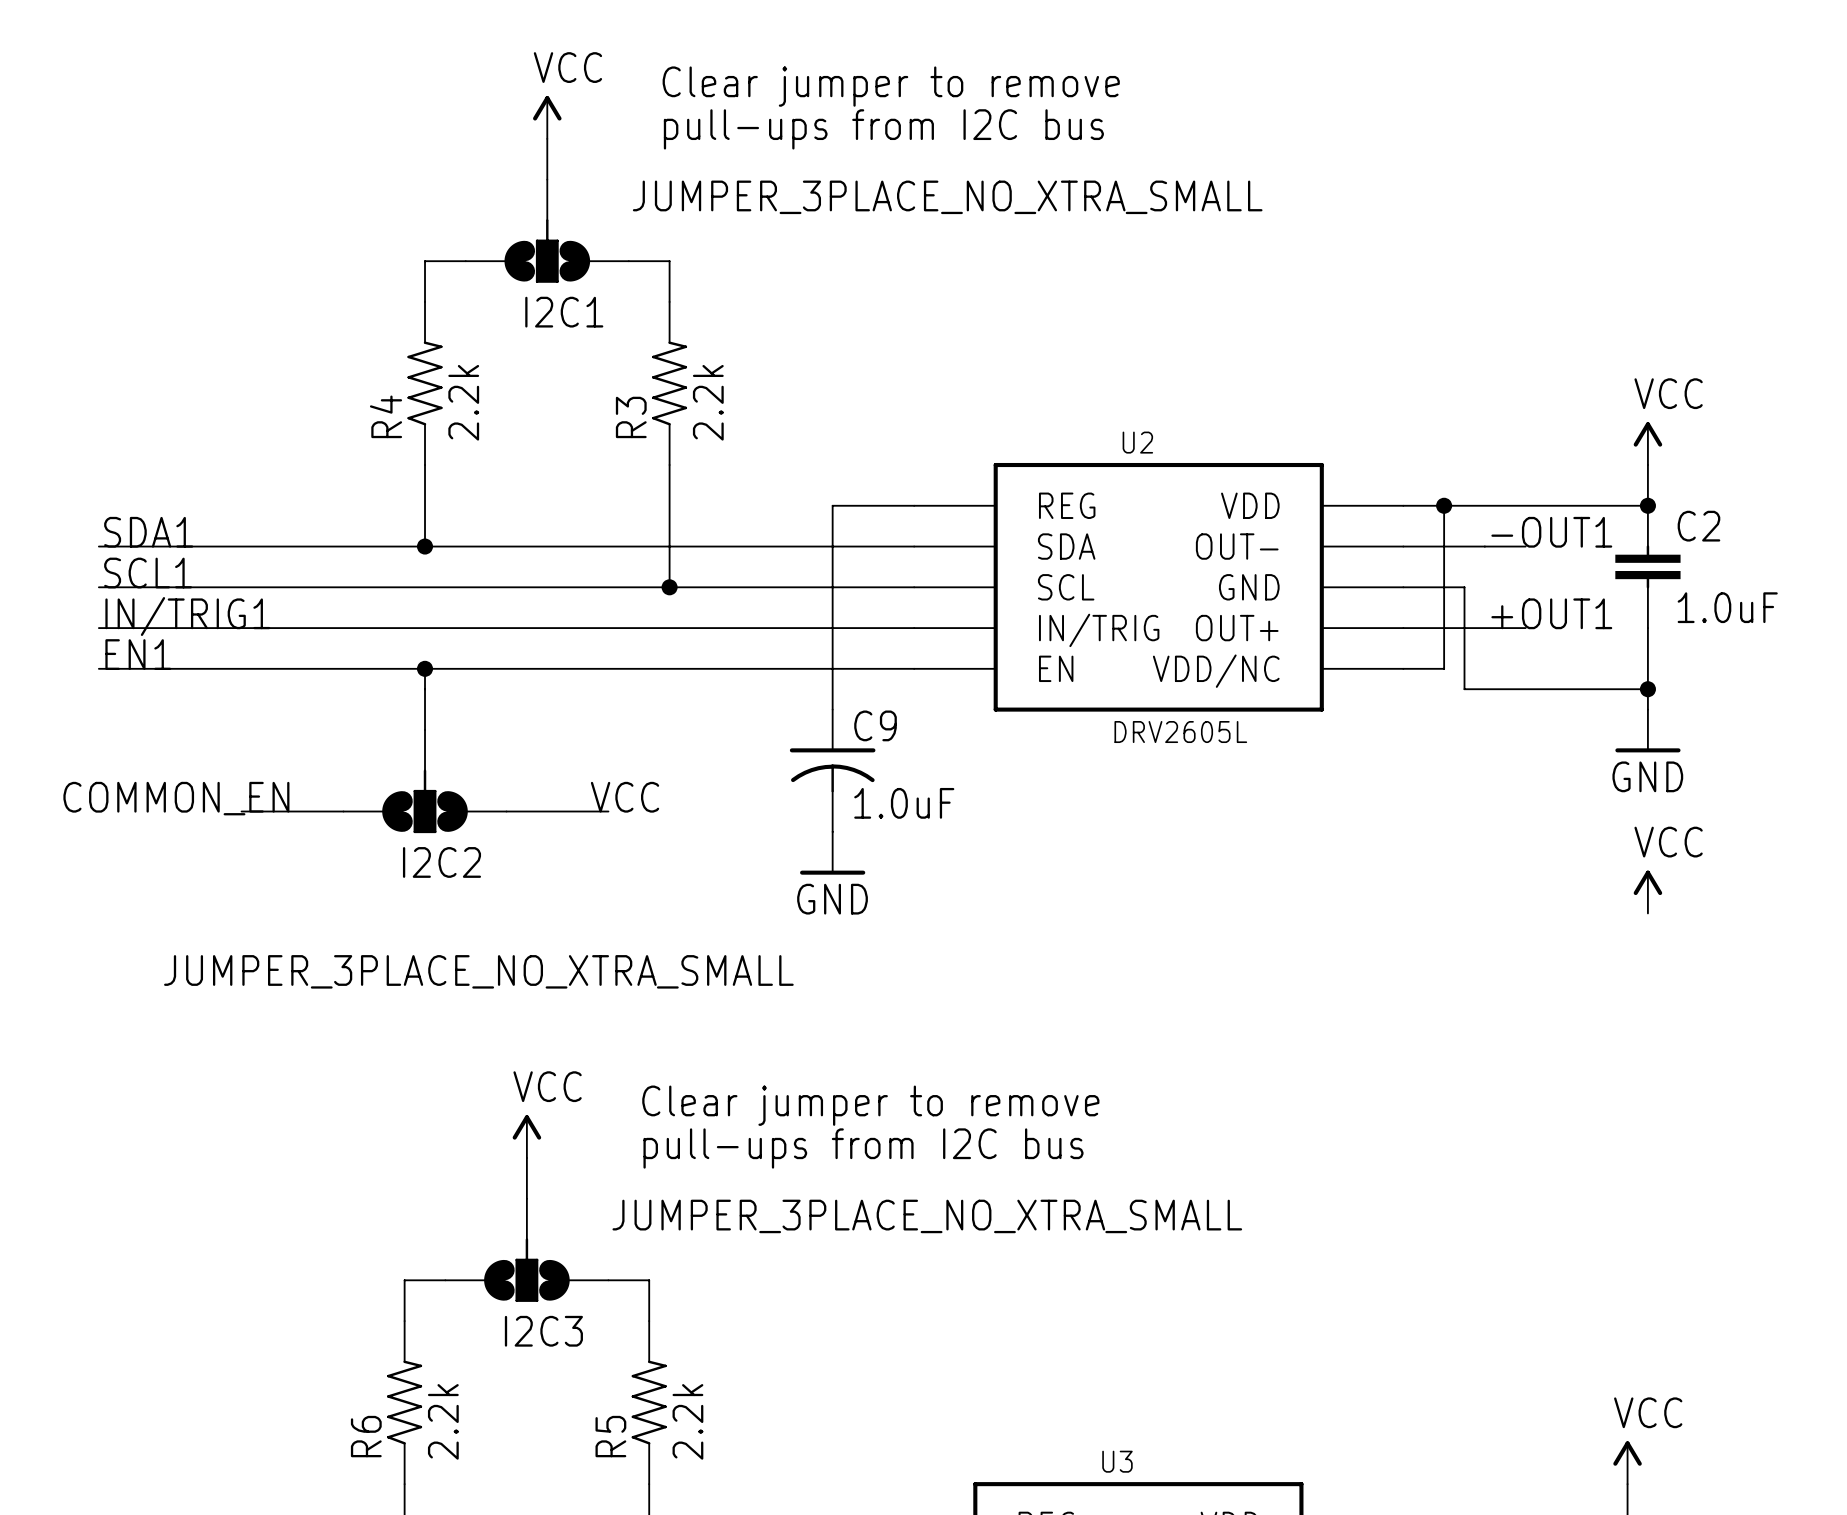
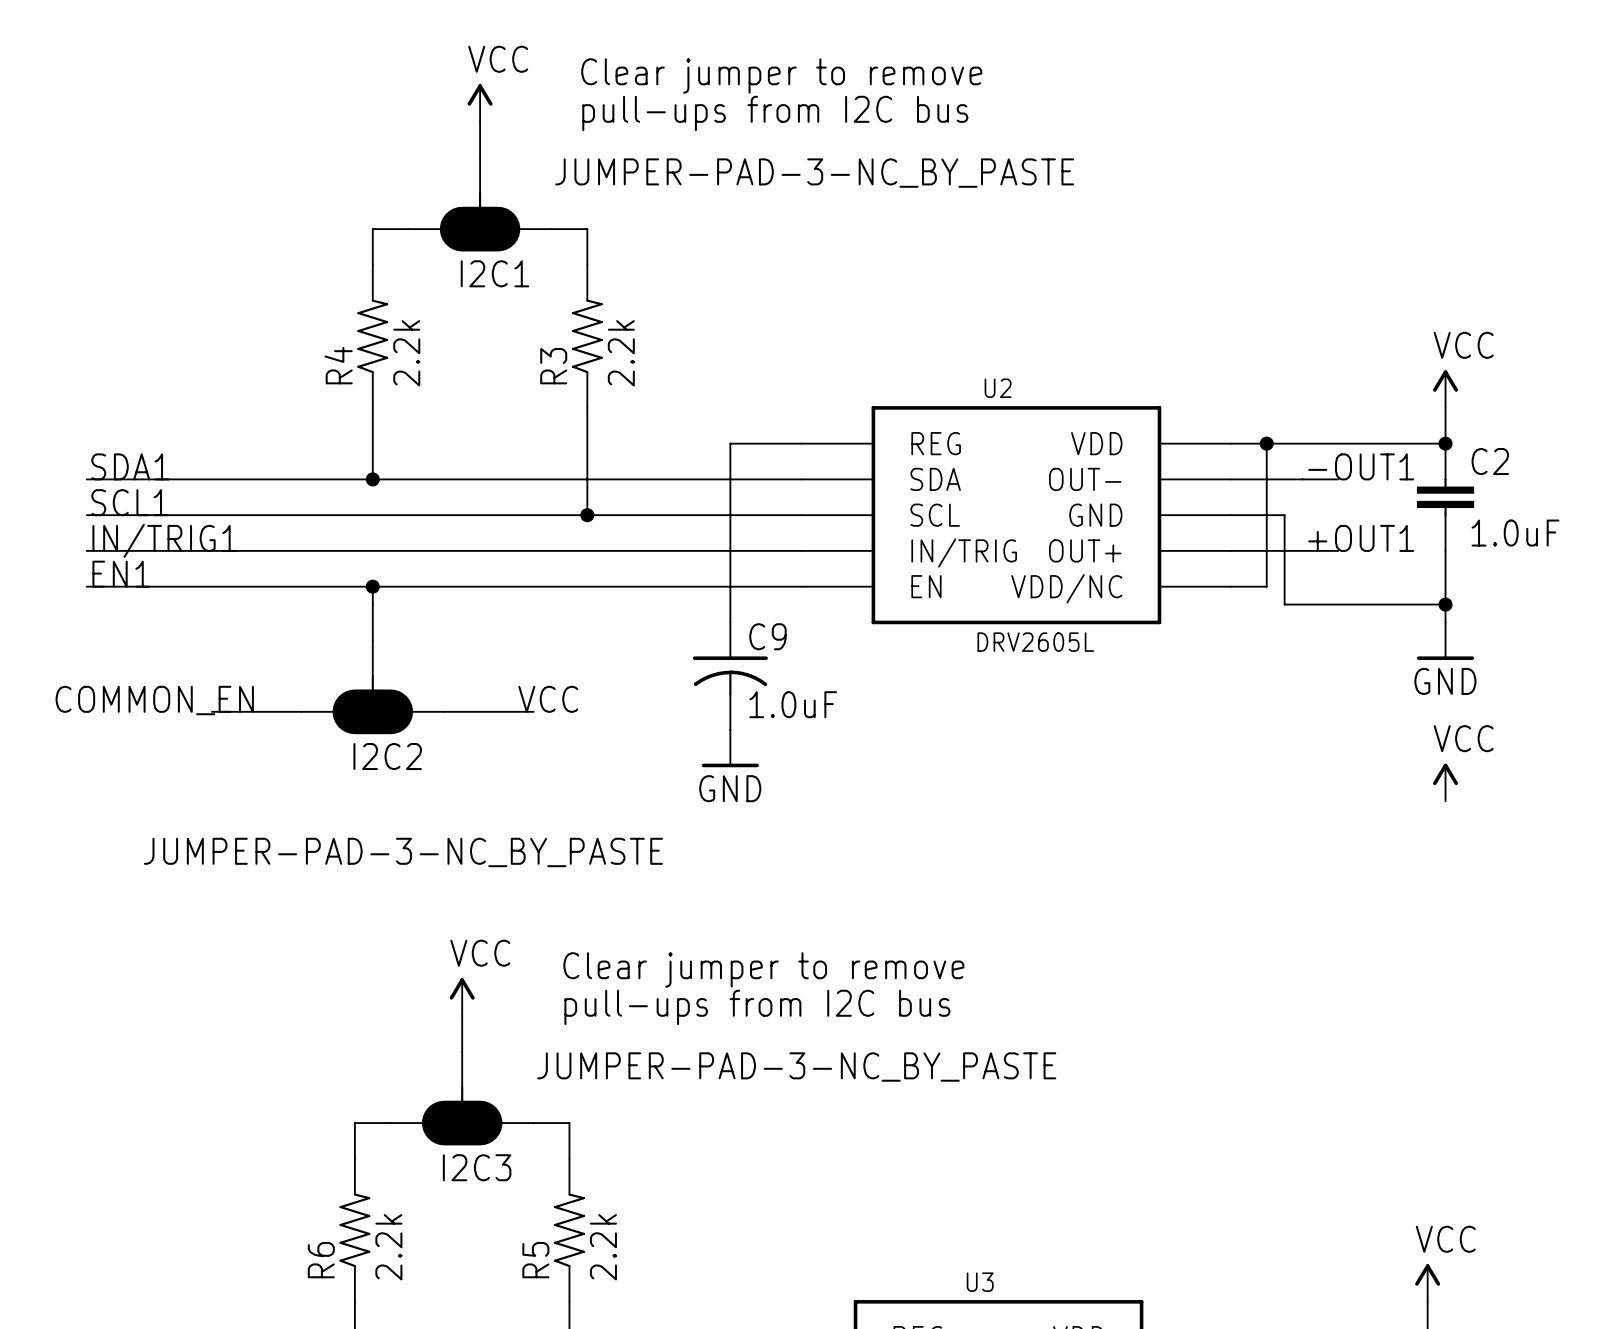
I2C1 symbol: [465, 179, 629, 283] -> [408, 157, 552, 252]
I2C1 value: JUMPER_3PLACE_NO_XTRA_SMALL (947, 197) -> JUMPER-PAD-3-NC_BY_PASTE (814, 173)
I2C2 symbol: [343, 729, 507, 834] -> [301, 640, 445, 735]
I2C2 value: JUMPER_3PLACE_NO_XTRA_SMALL (478, 971) -> JUMPER-PAD-3-NC_BY_PASTE (403, 852)
I2C3 symbol: [445, 1198, 609, 1302] -> [390, 1051, 534, 1146]
I2C3 value: JUMPER_3PLACE_NO_XTRA_SMALL (927, 1216) -> JUMPER-PAD-3-NC_BY_PASTE (796, 1067)

